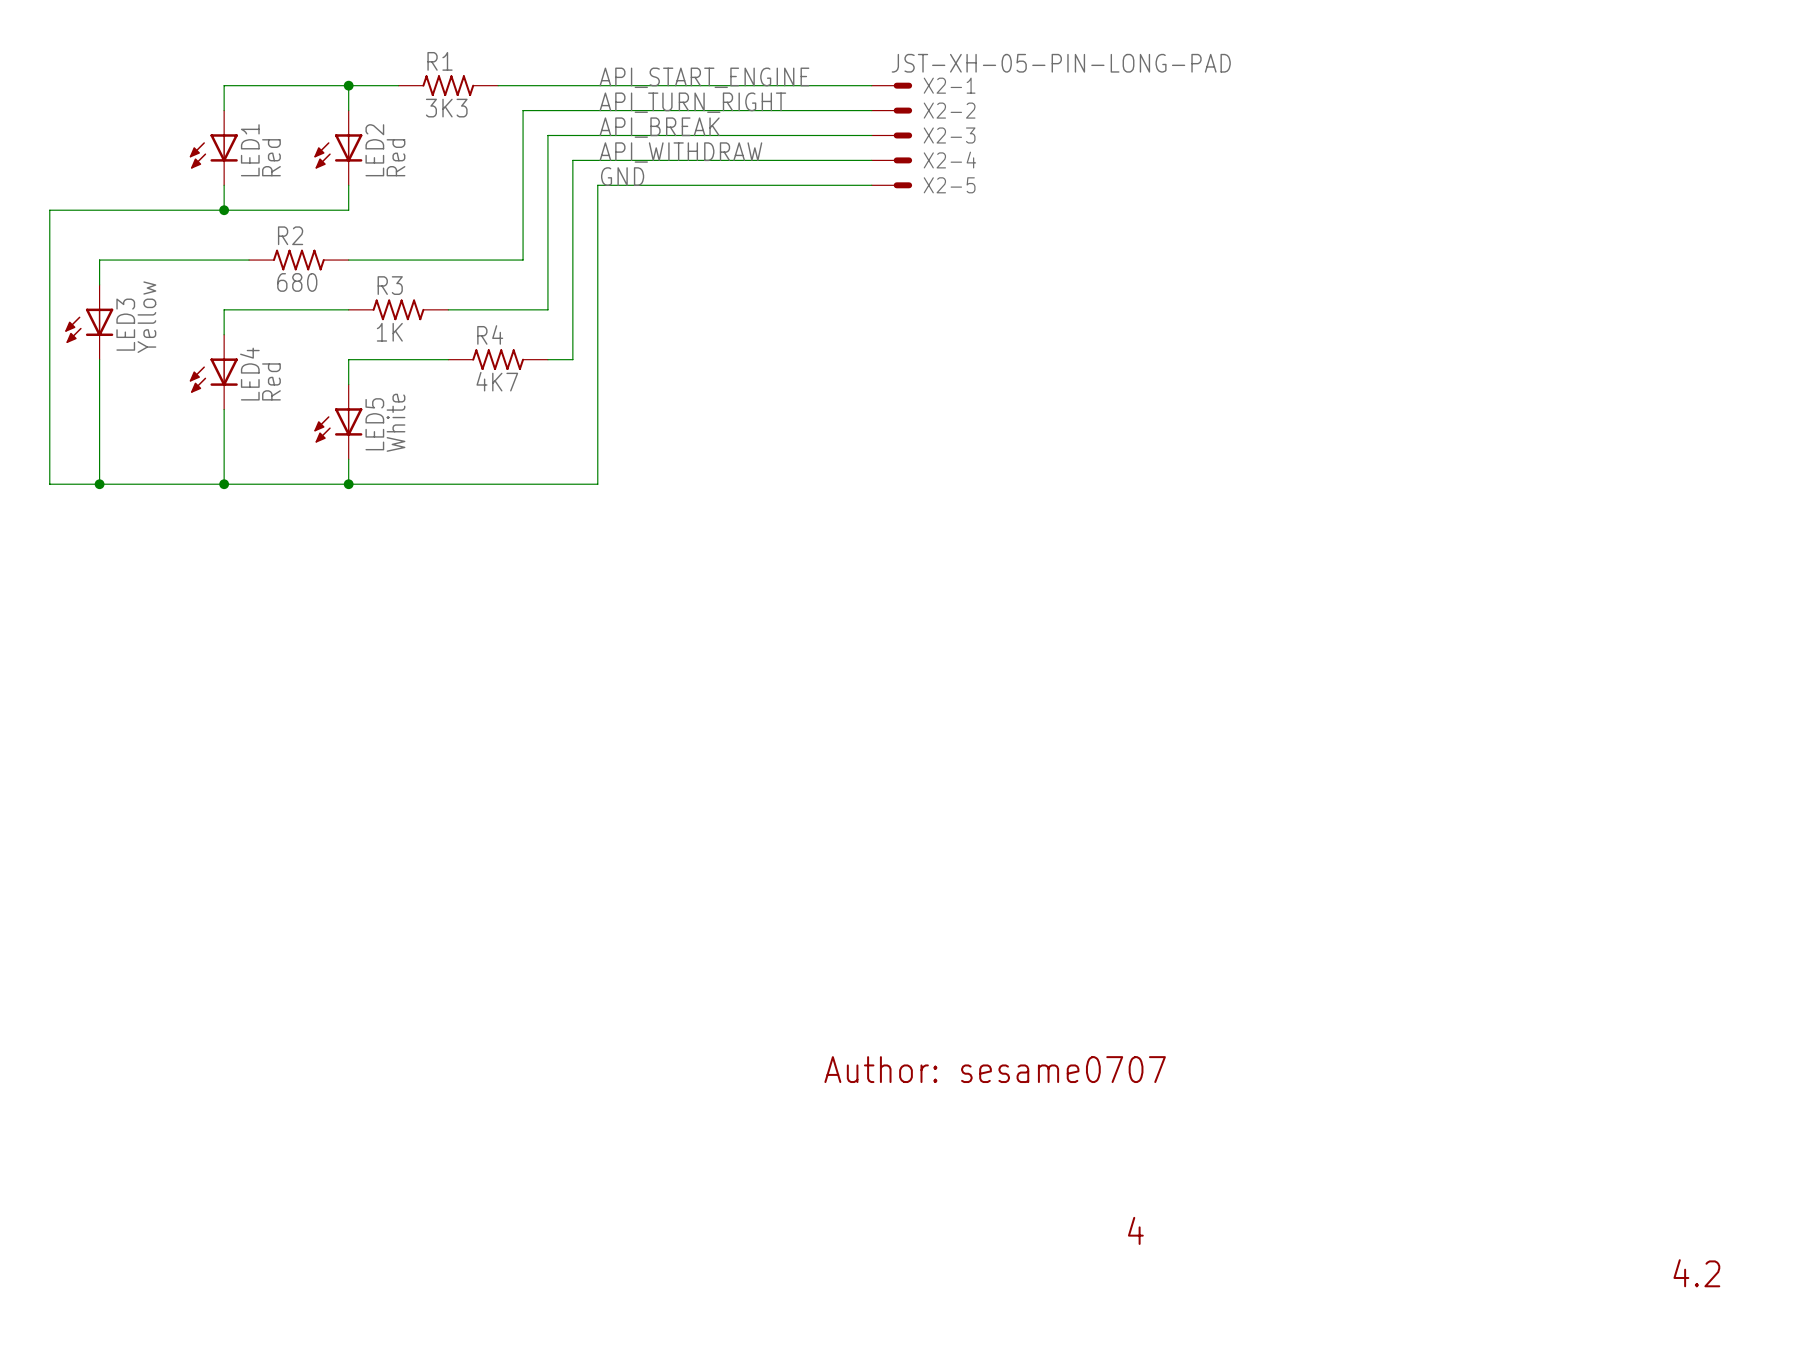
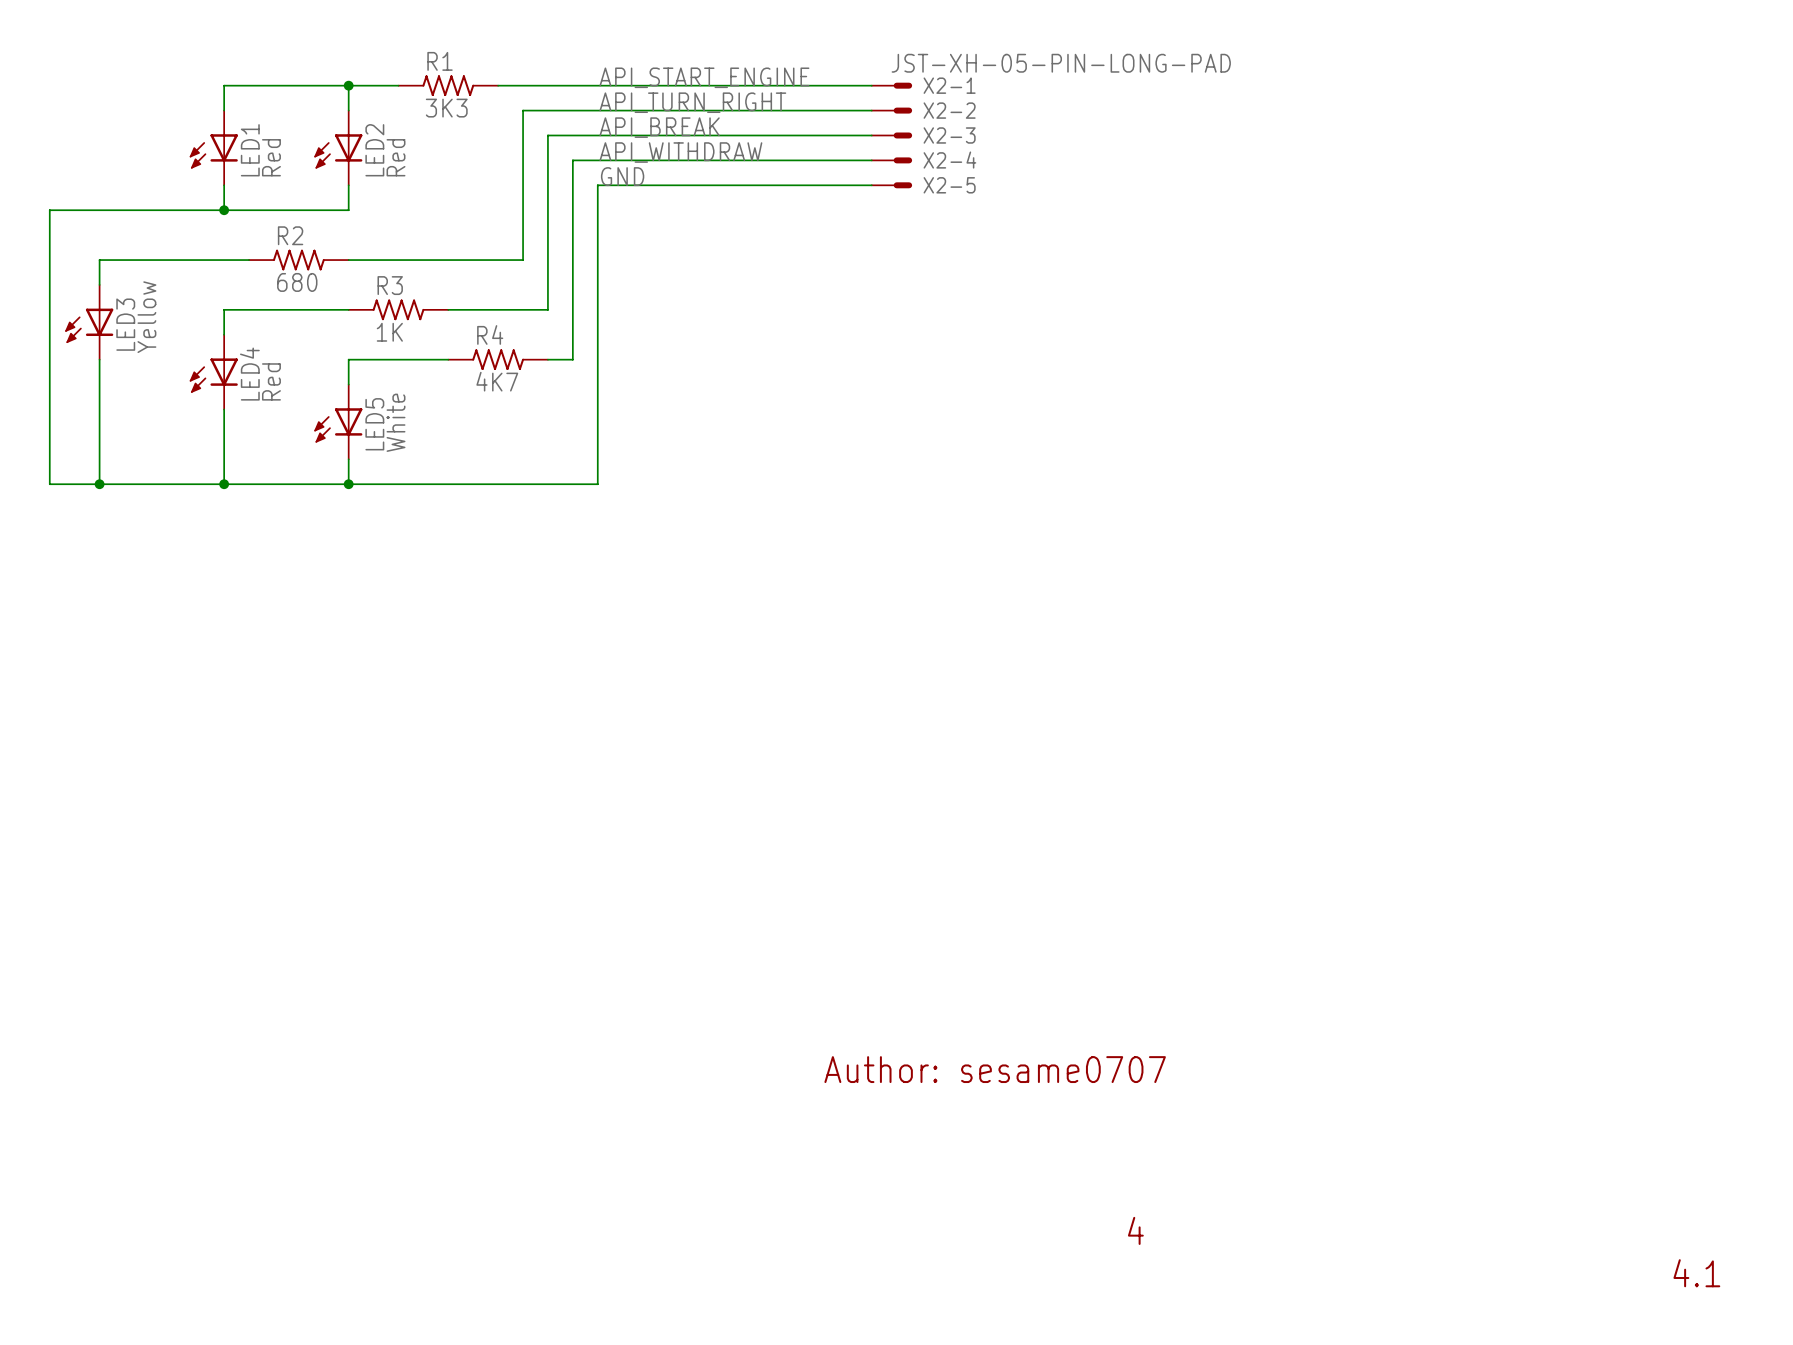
text: 4.2 (1696, 1273) -> 4.1 (1696, 1273)

